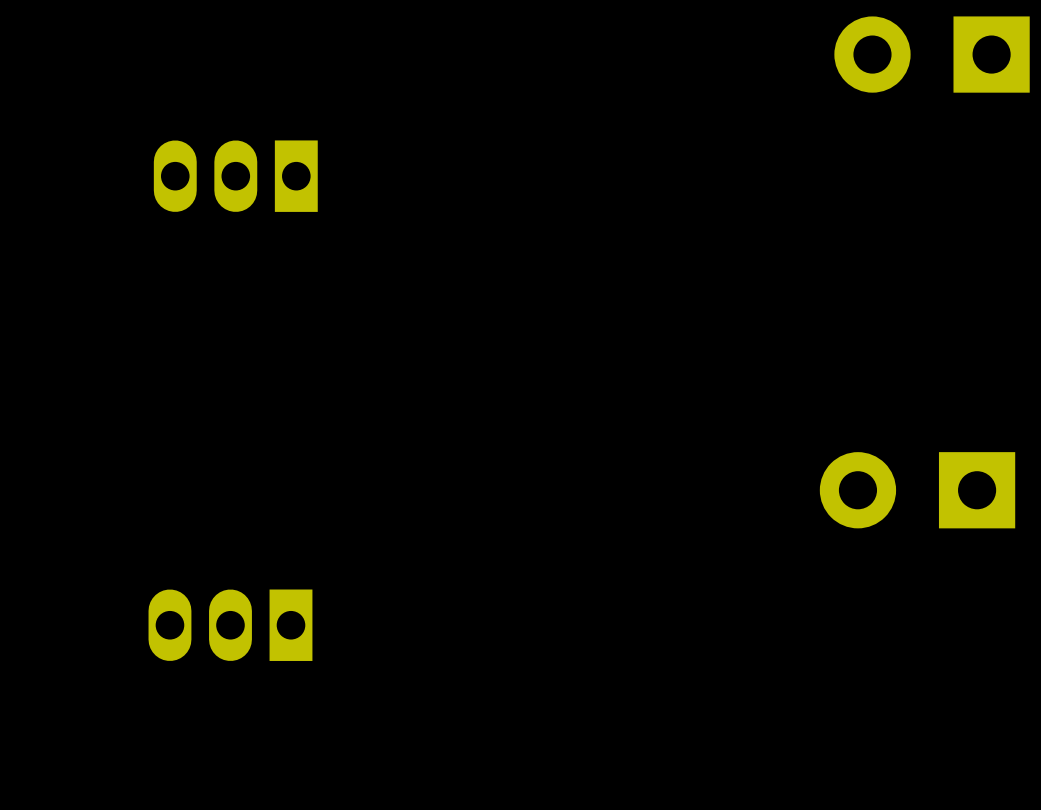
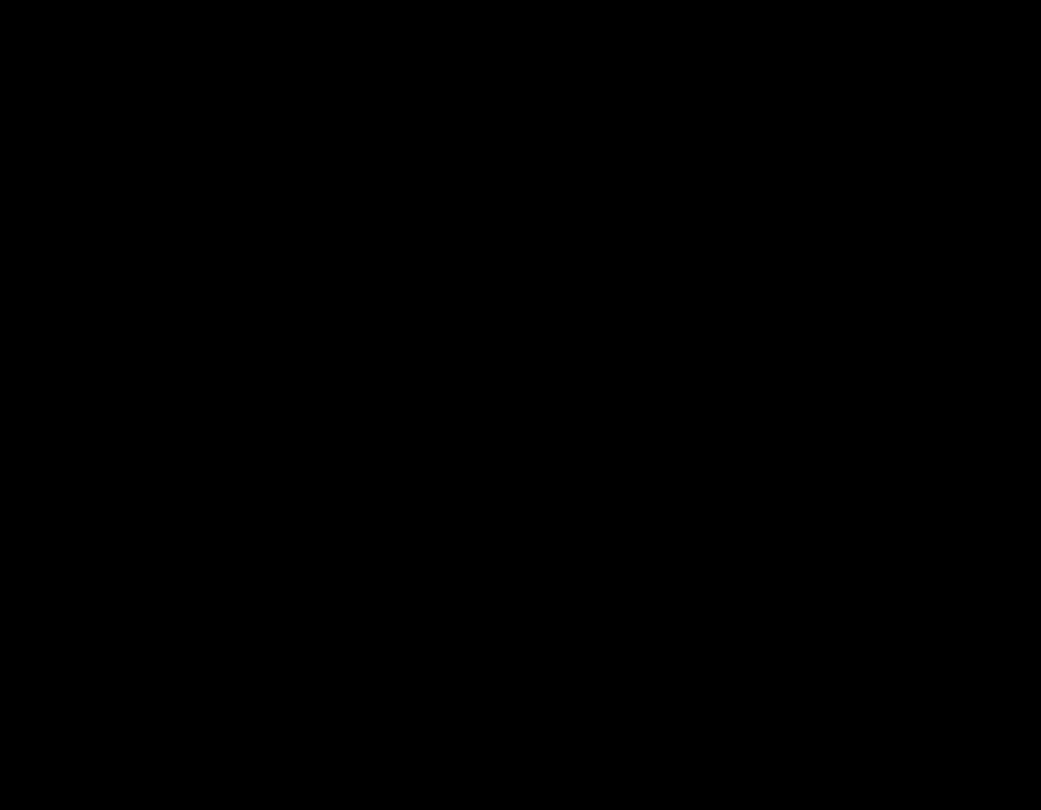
part: (932, 54) -> none
part: (235, 176) -> none
part: (917, 490) -> none
part: (230, 625) -> none

